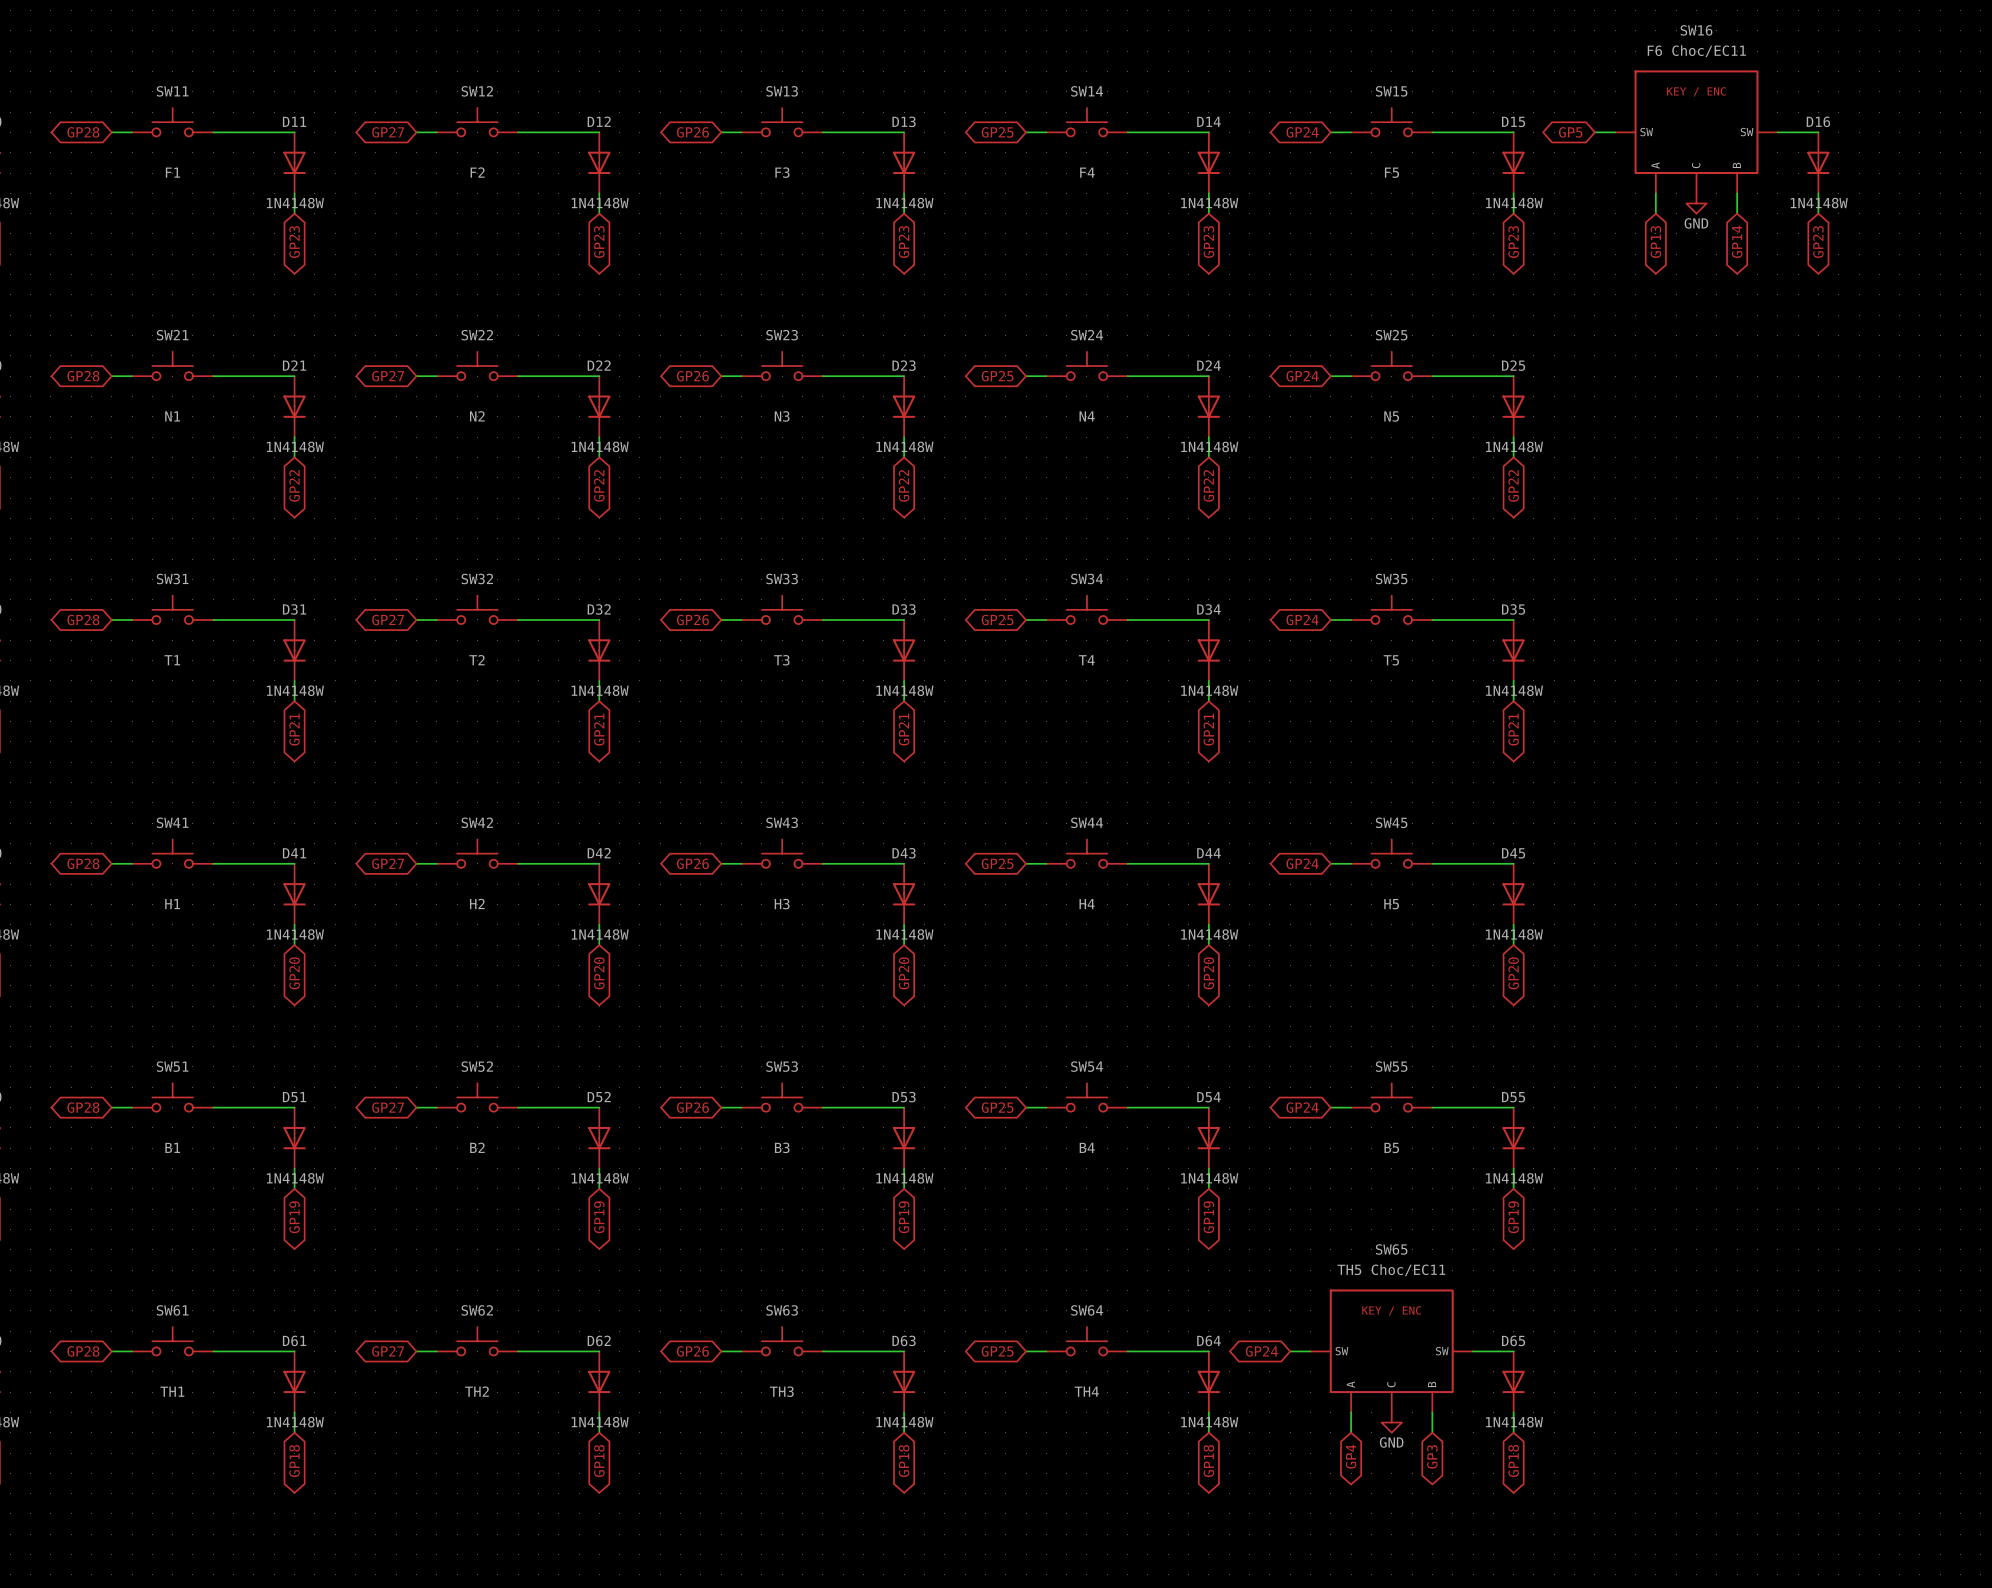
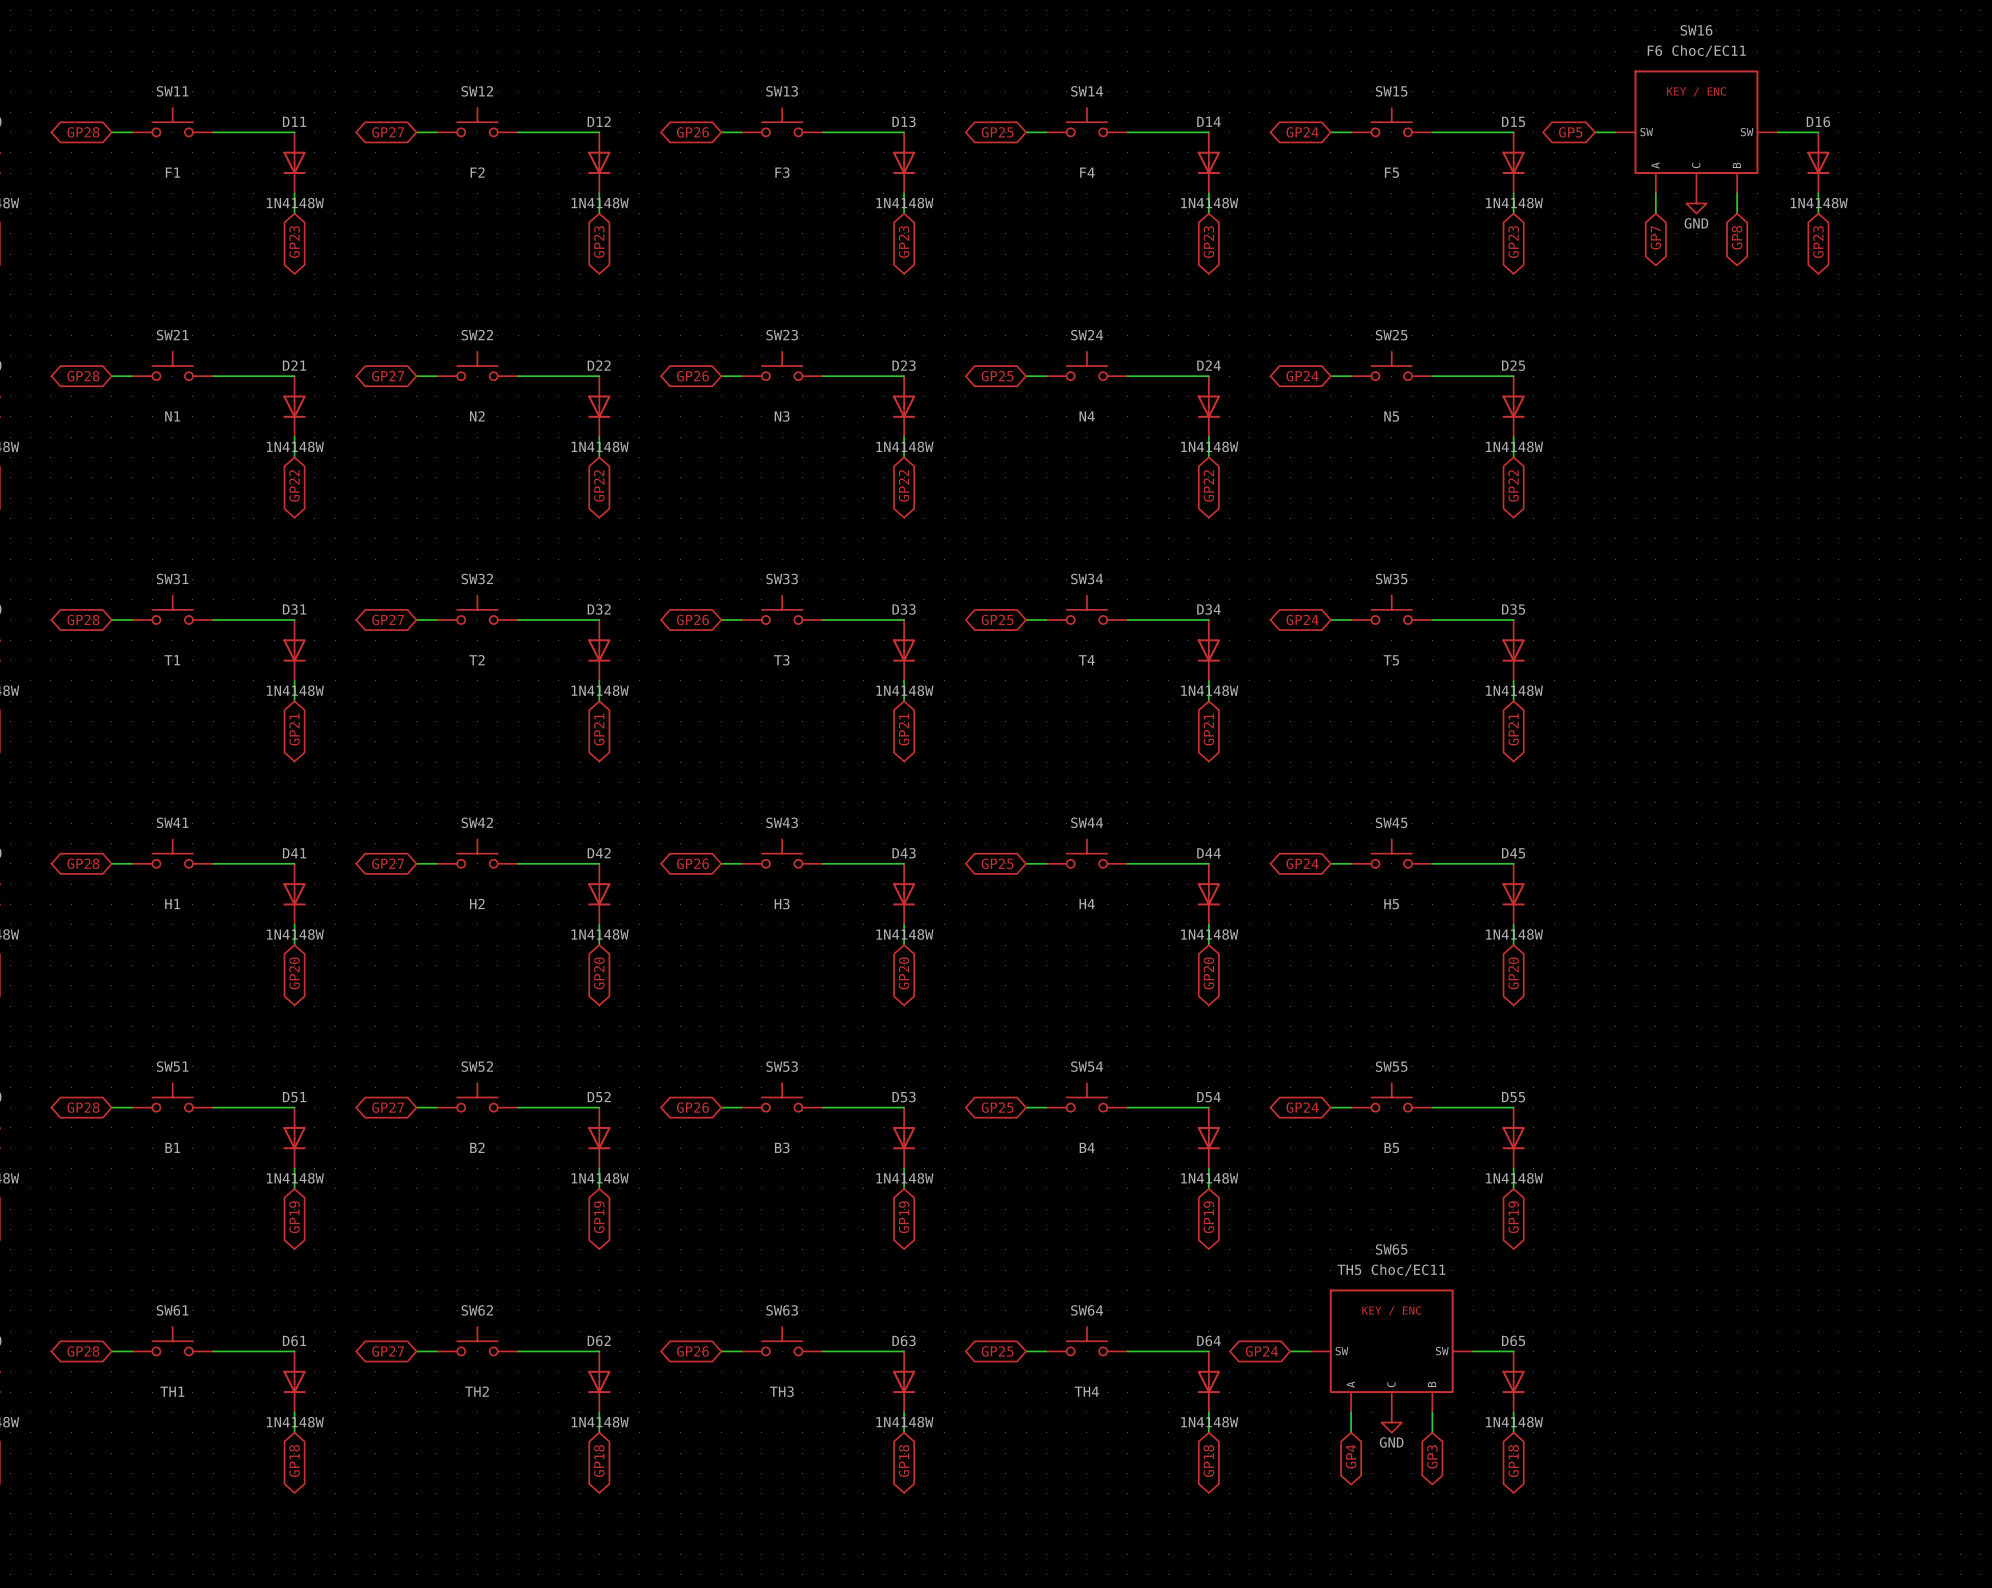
global label: GP14 (1737, 241) -> GP8 (1737, 237)
global label: GP13 (1655, 242) -> GP7 (1655, 237)

